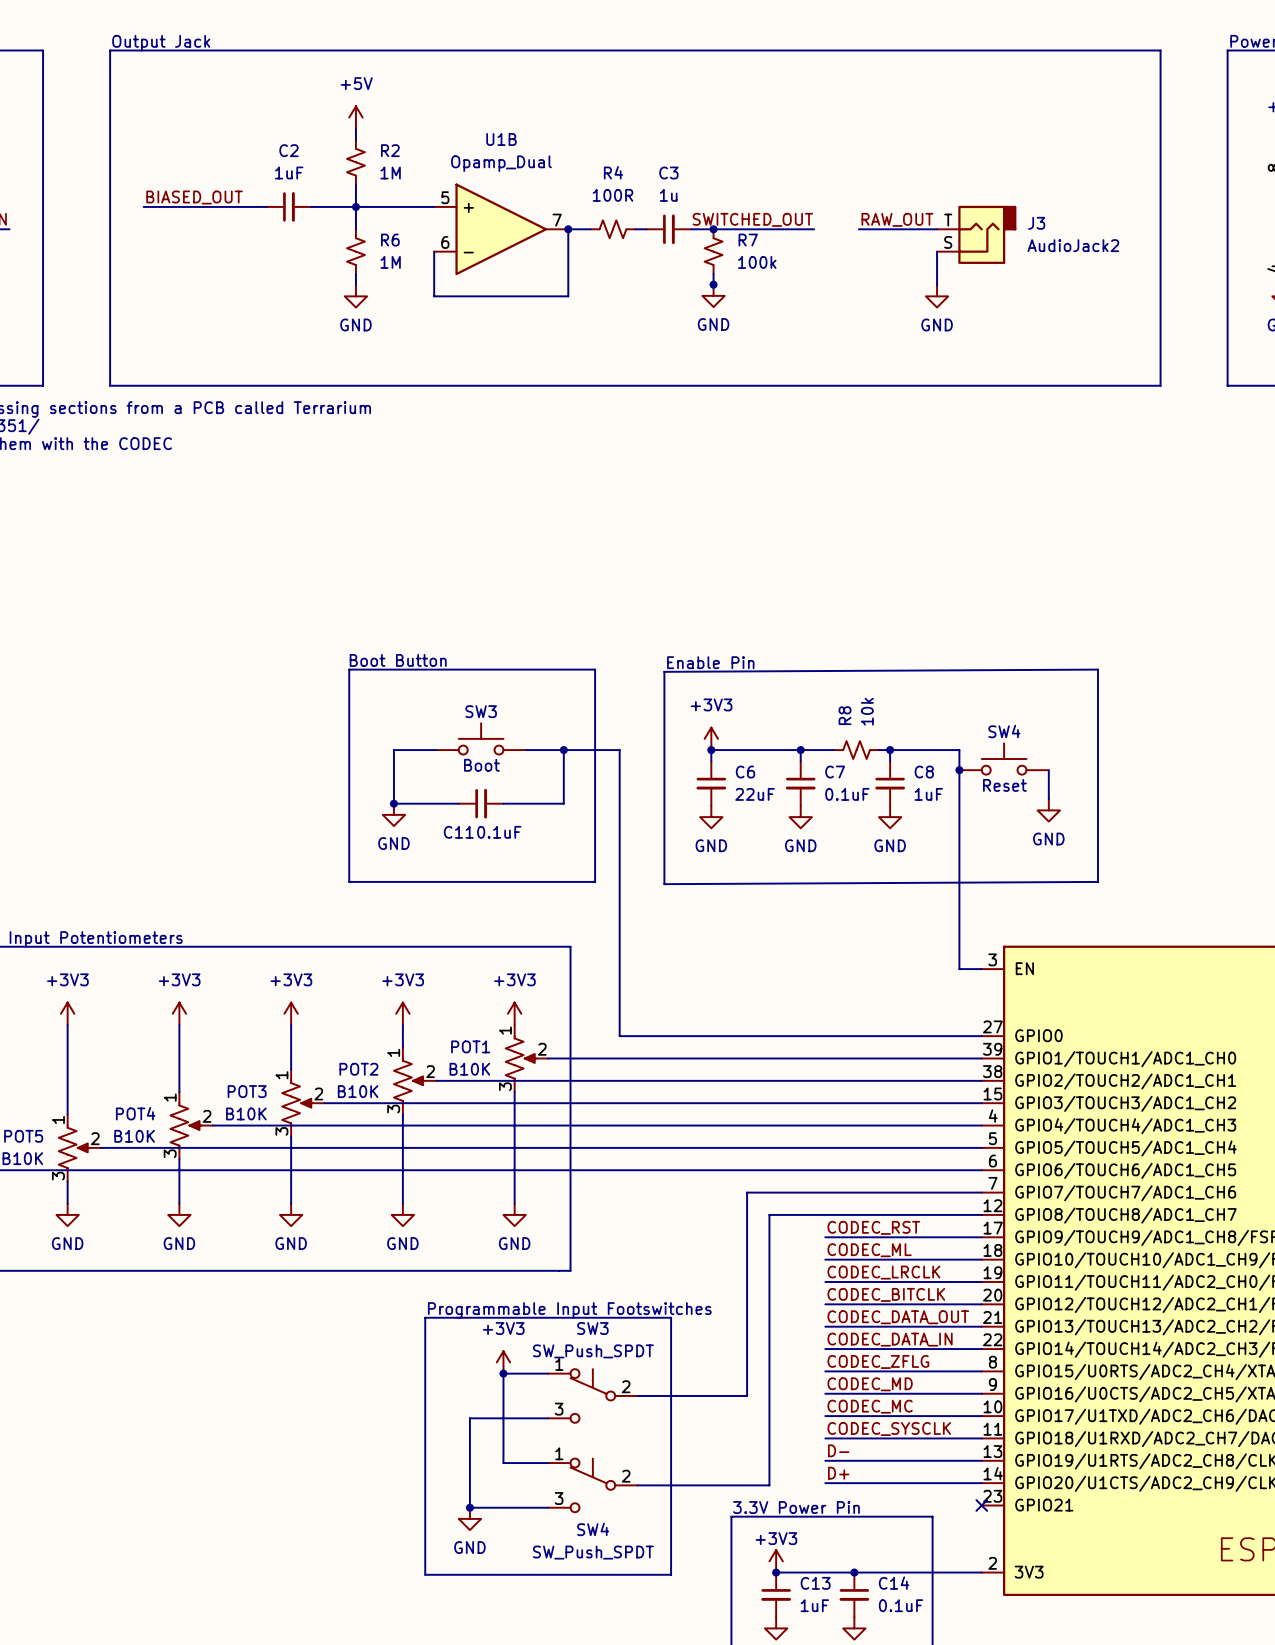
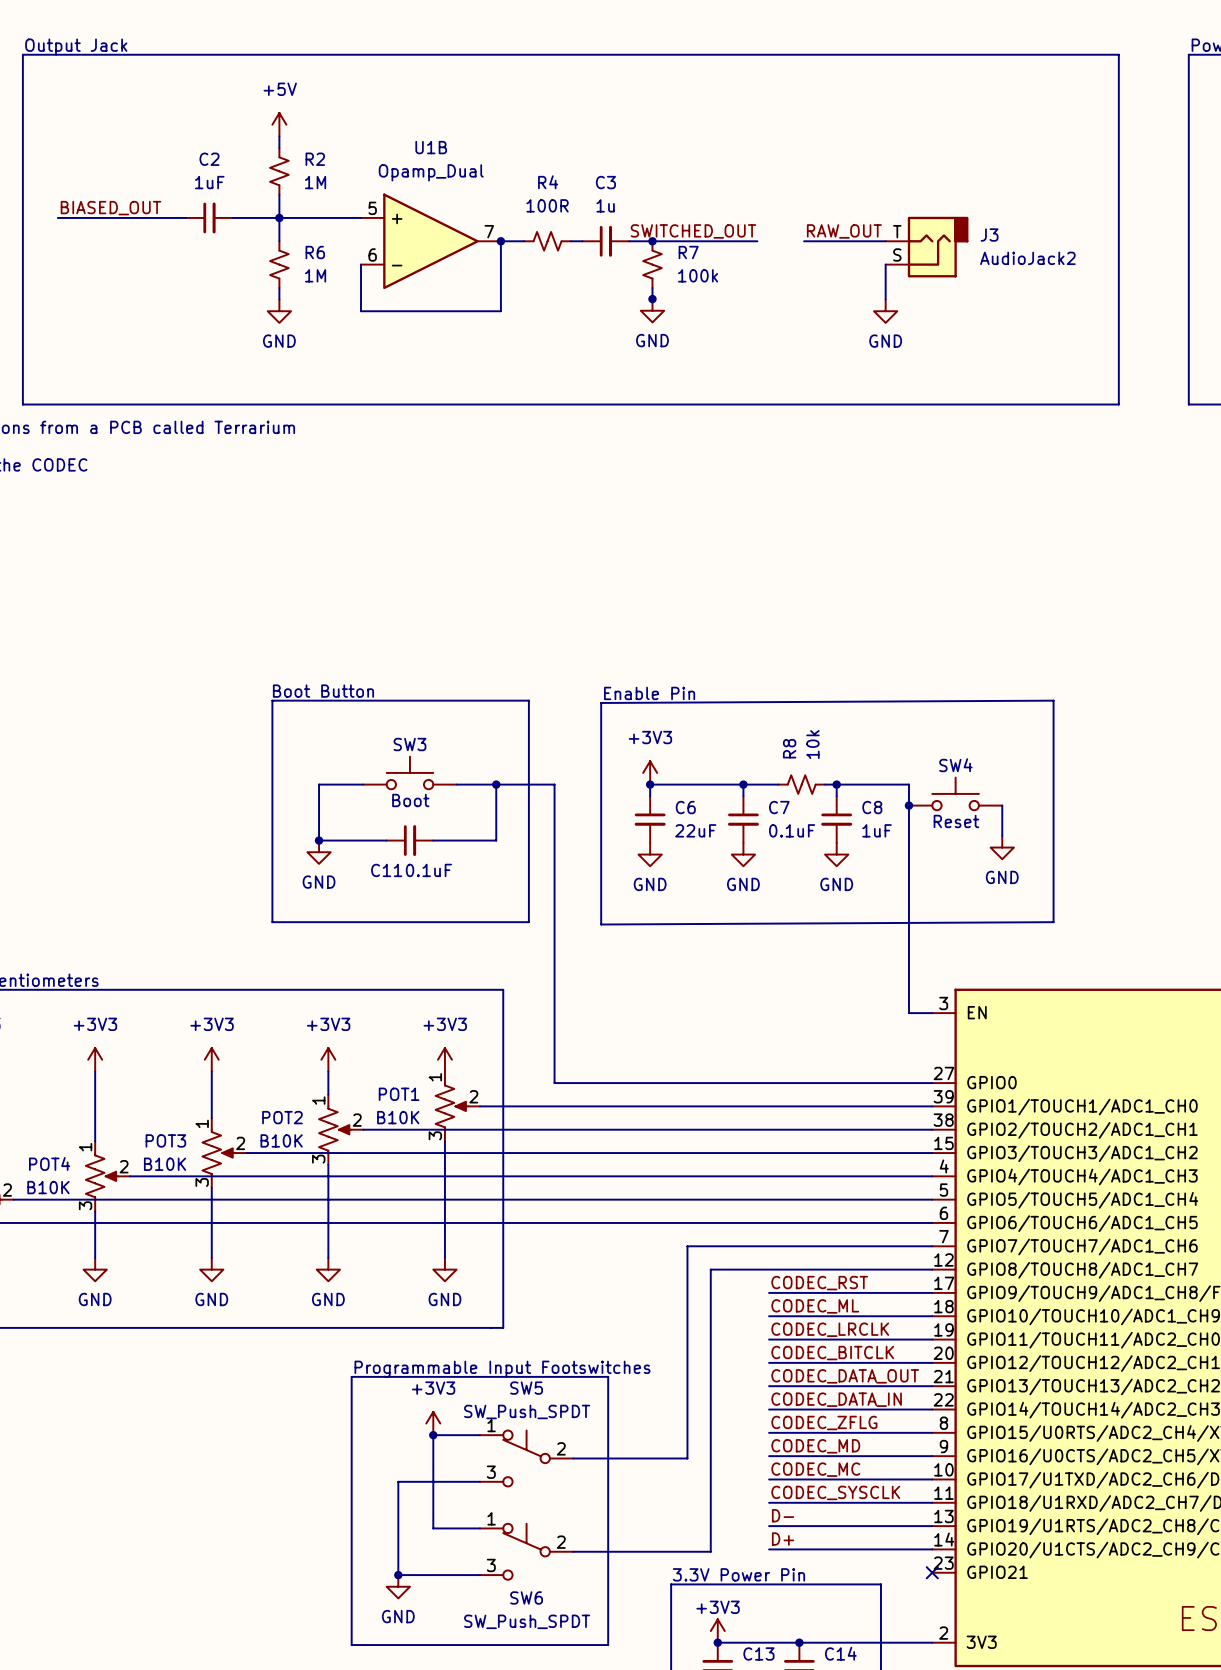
SW3 name: SW3 (592, 1328) -> SW5 (526, 1388)
SW4 name: SW4 (593, 1529) -> SW6 (526, 1597)

